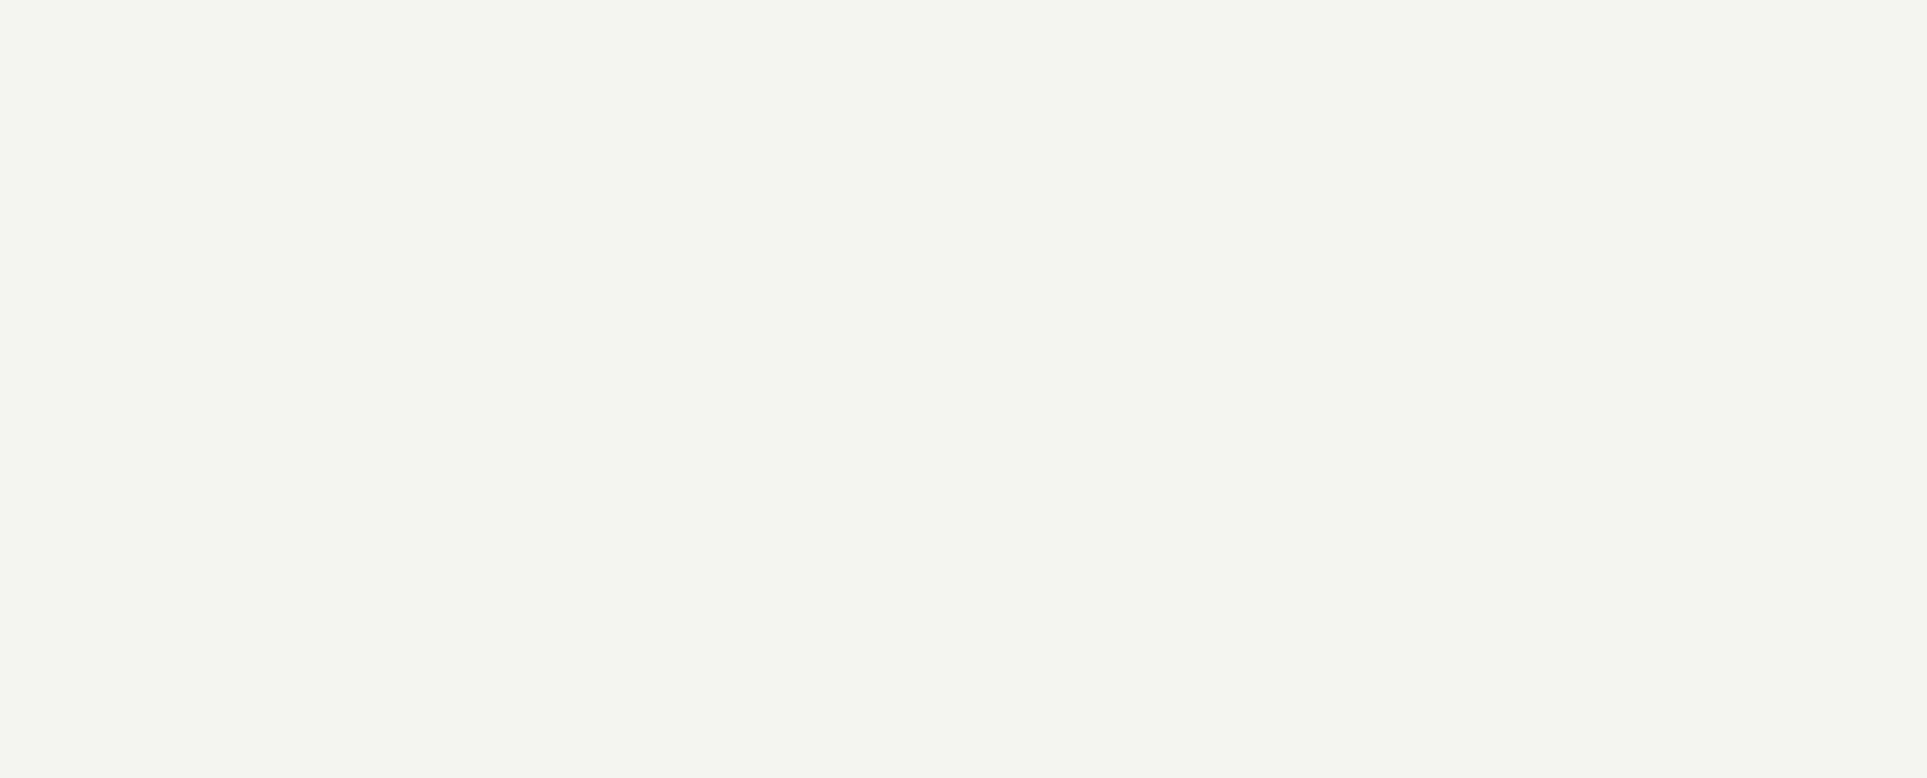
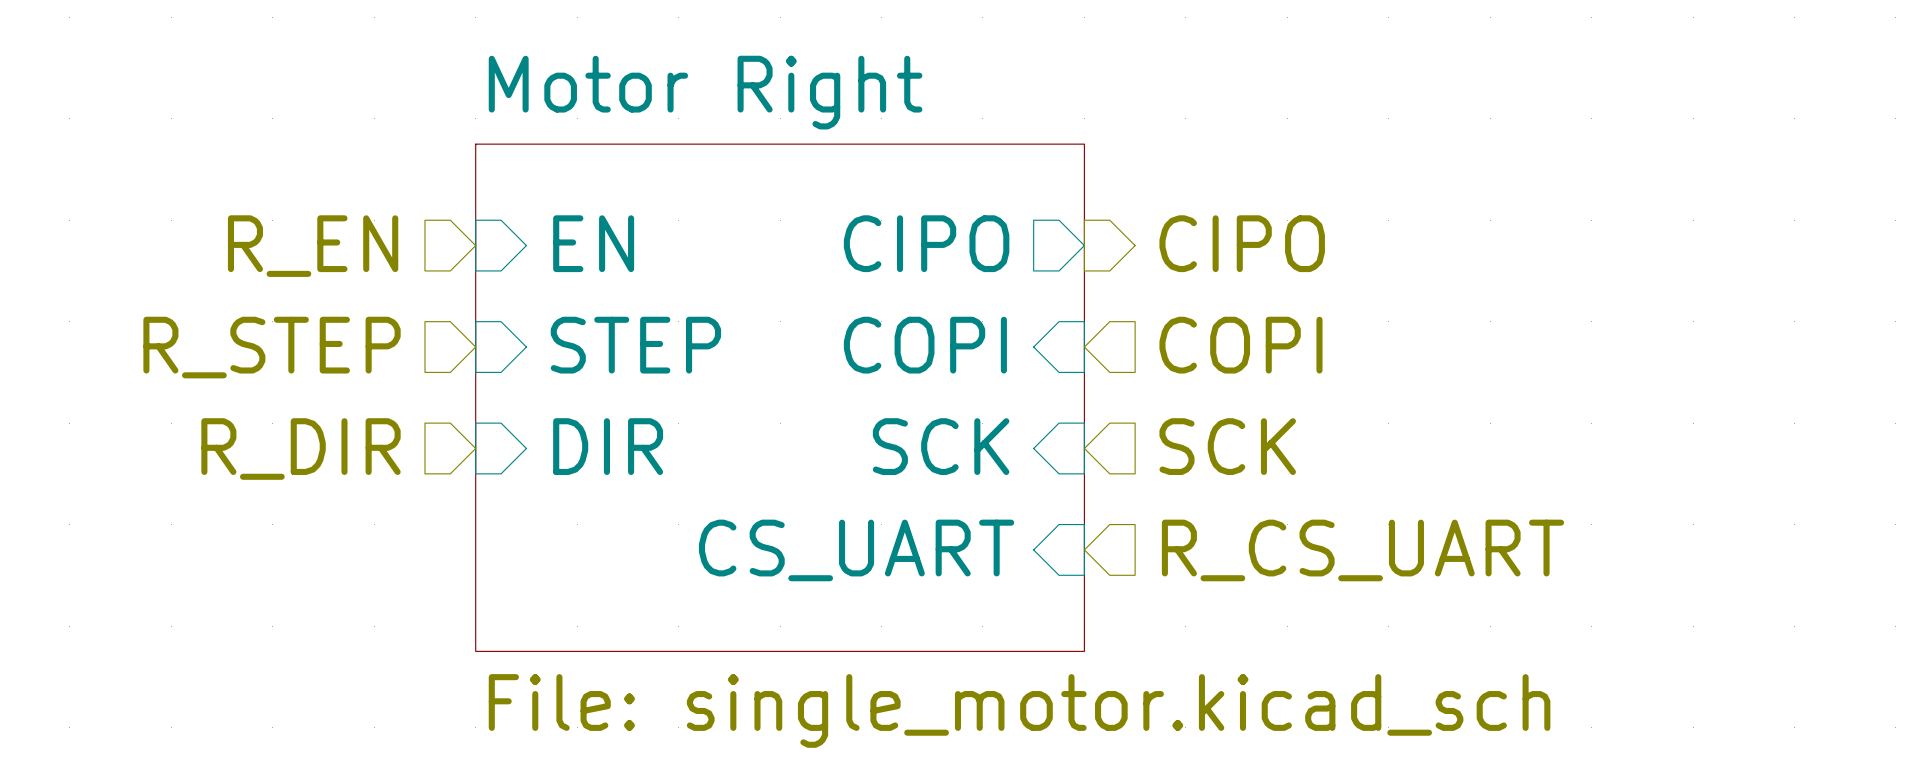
sheet pin: none -> EN (593, 243)
sheet pin: none -> CIPO (926, 243)
hierarchical label: none -> CIPO (1242, 243)
hierarchical label: none -> R_EN (313, 246)
sheet pin: none -> STEP (635, 345)
sheet pin: none -> COPI (925, 345)
hierarchical label: none -> COPI (1240, 345)
hierarchical label: none -> R_STEP (272, 347)
sheet Motor Right: none -> File: single_motor.kicad_sch (780, 397)
sheet pin: none -> DIR (608, 446)
sheet pin: none -> SCK (941, 446)
hierarchical label: none -> SCK (1227, 446)
hierarchical label: none -> R_DIR (301, 449)
sheet pin: none -> CS_UART (856, 550)
hierarchical label: none -> R_CS_UART (1362, 550)

